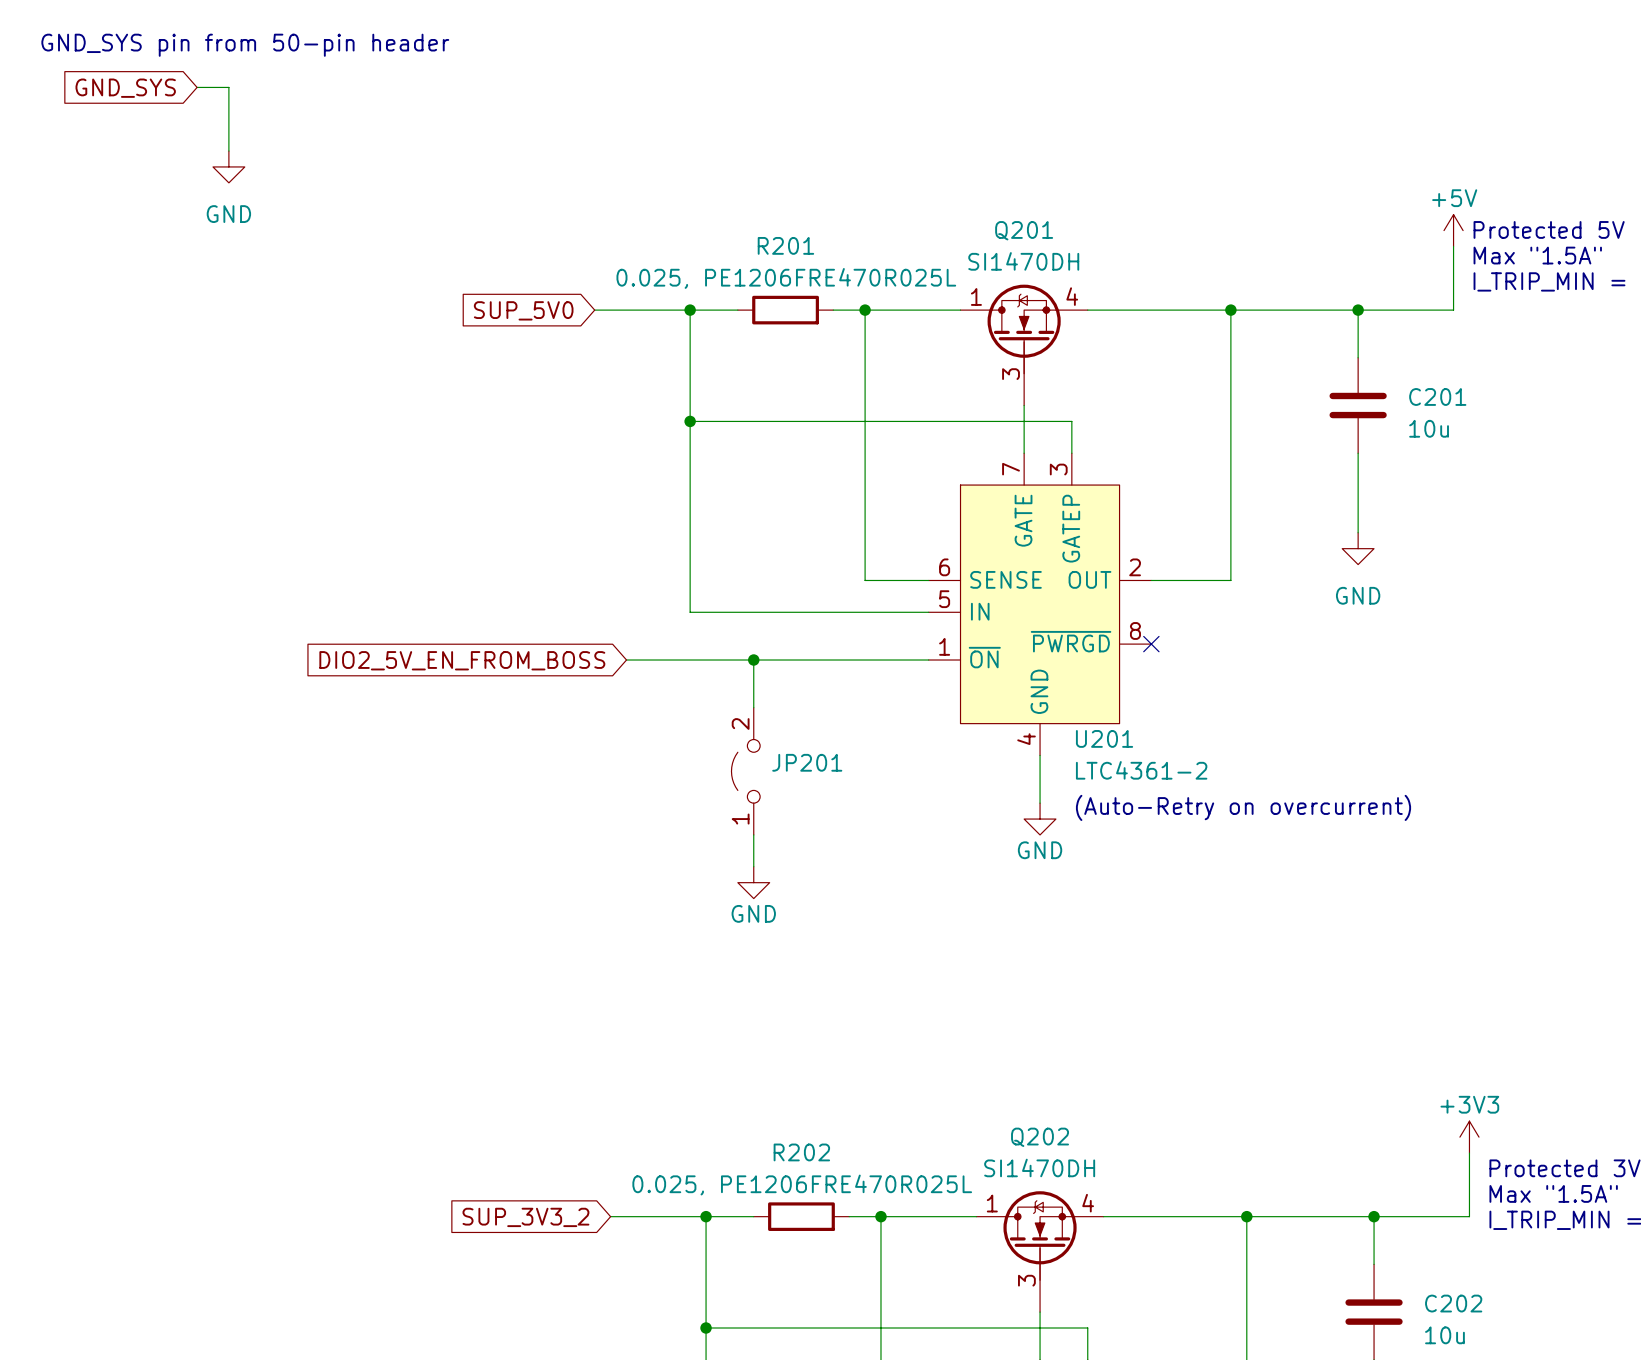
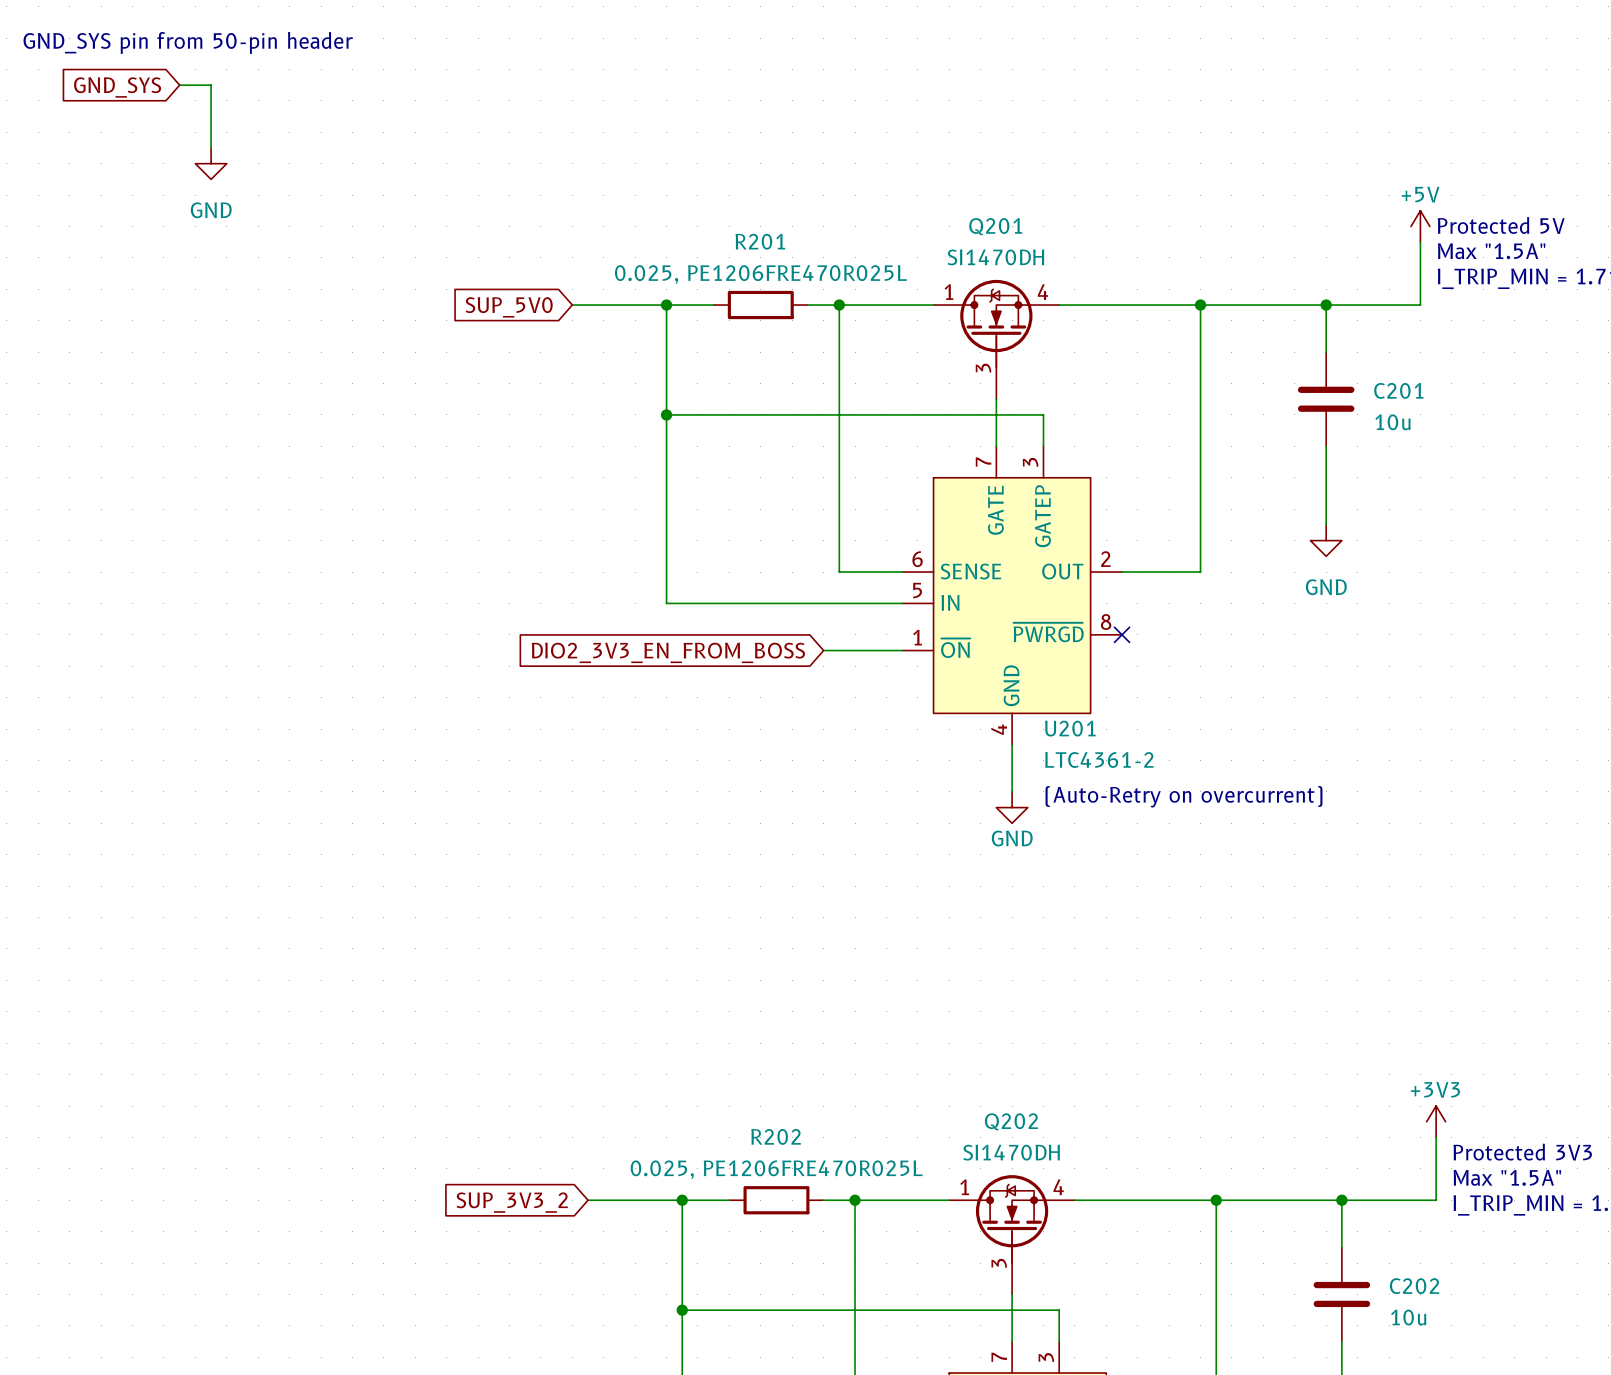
global label: DIO2_5V_EN_FROM_BOSS (462, 660) -> DIO2_3V3_EN_FROM_BOSS (668, 652)
wire: (626, 660) (849, 660) -> none
wire: (753, 660) (753, 707) -> none
junction: (753, 660) -> none
JP201: (745, 771) -> none
wire: (753, 834) (753, 866) -> none
power symbol: GND (753, 882) -> none

